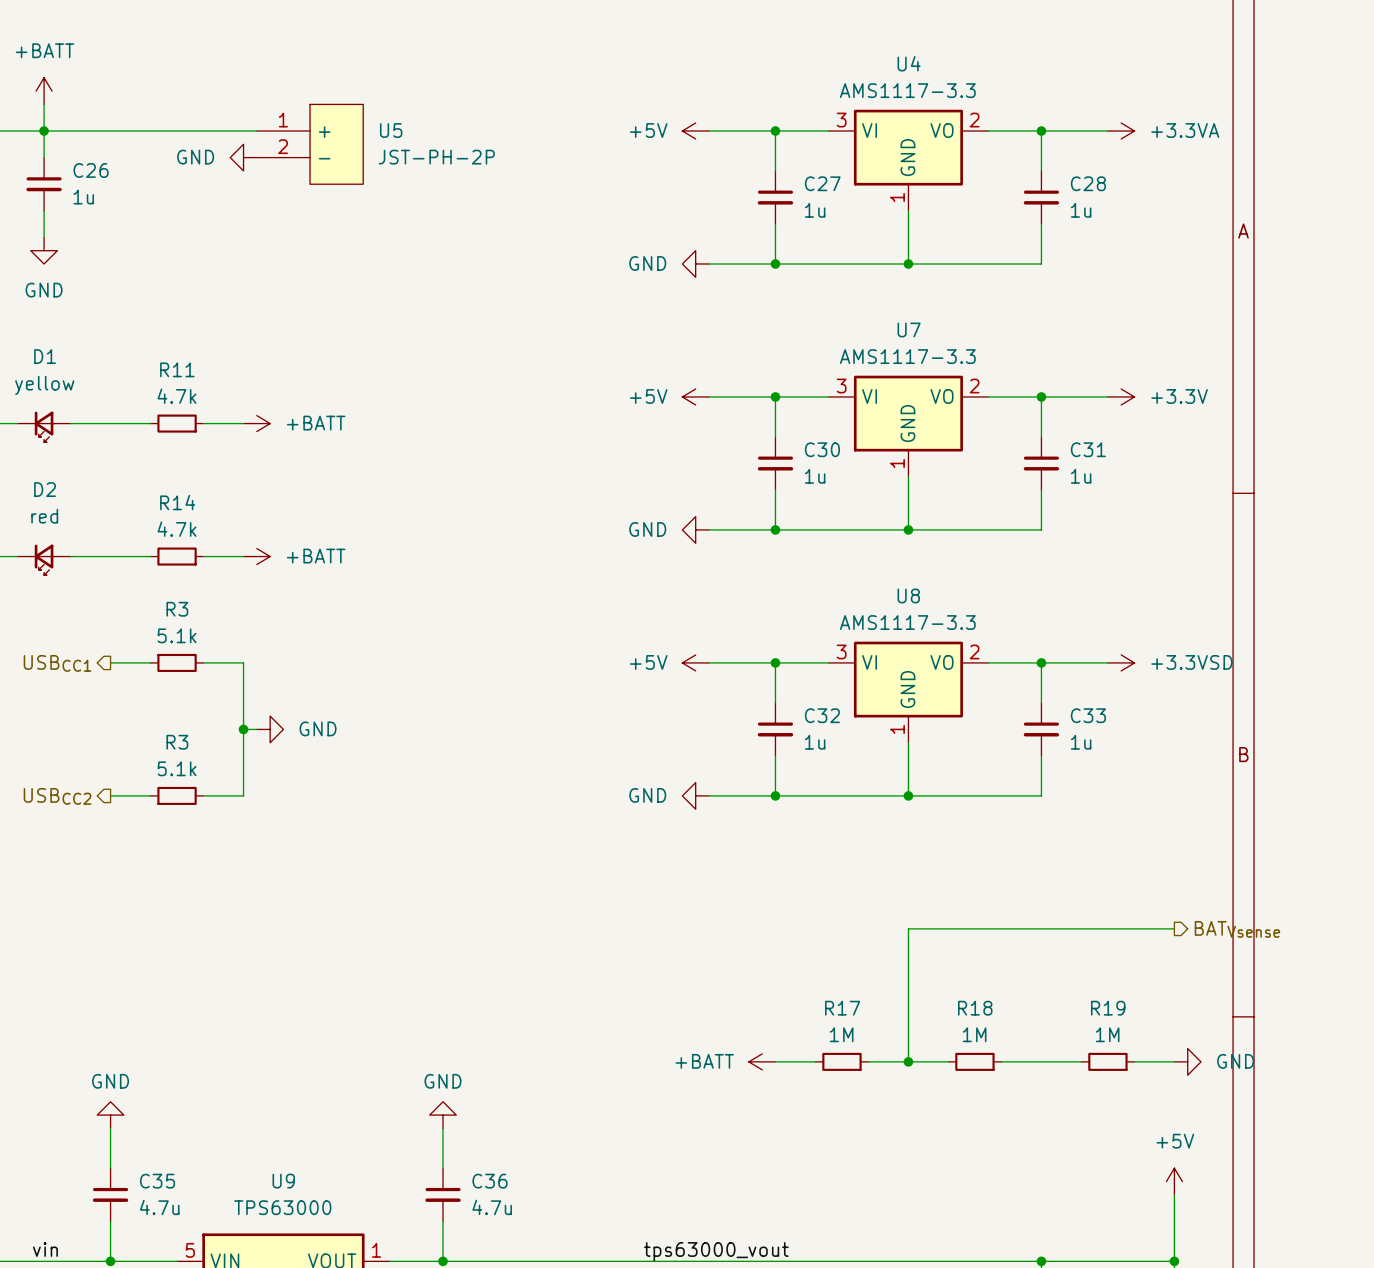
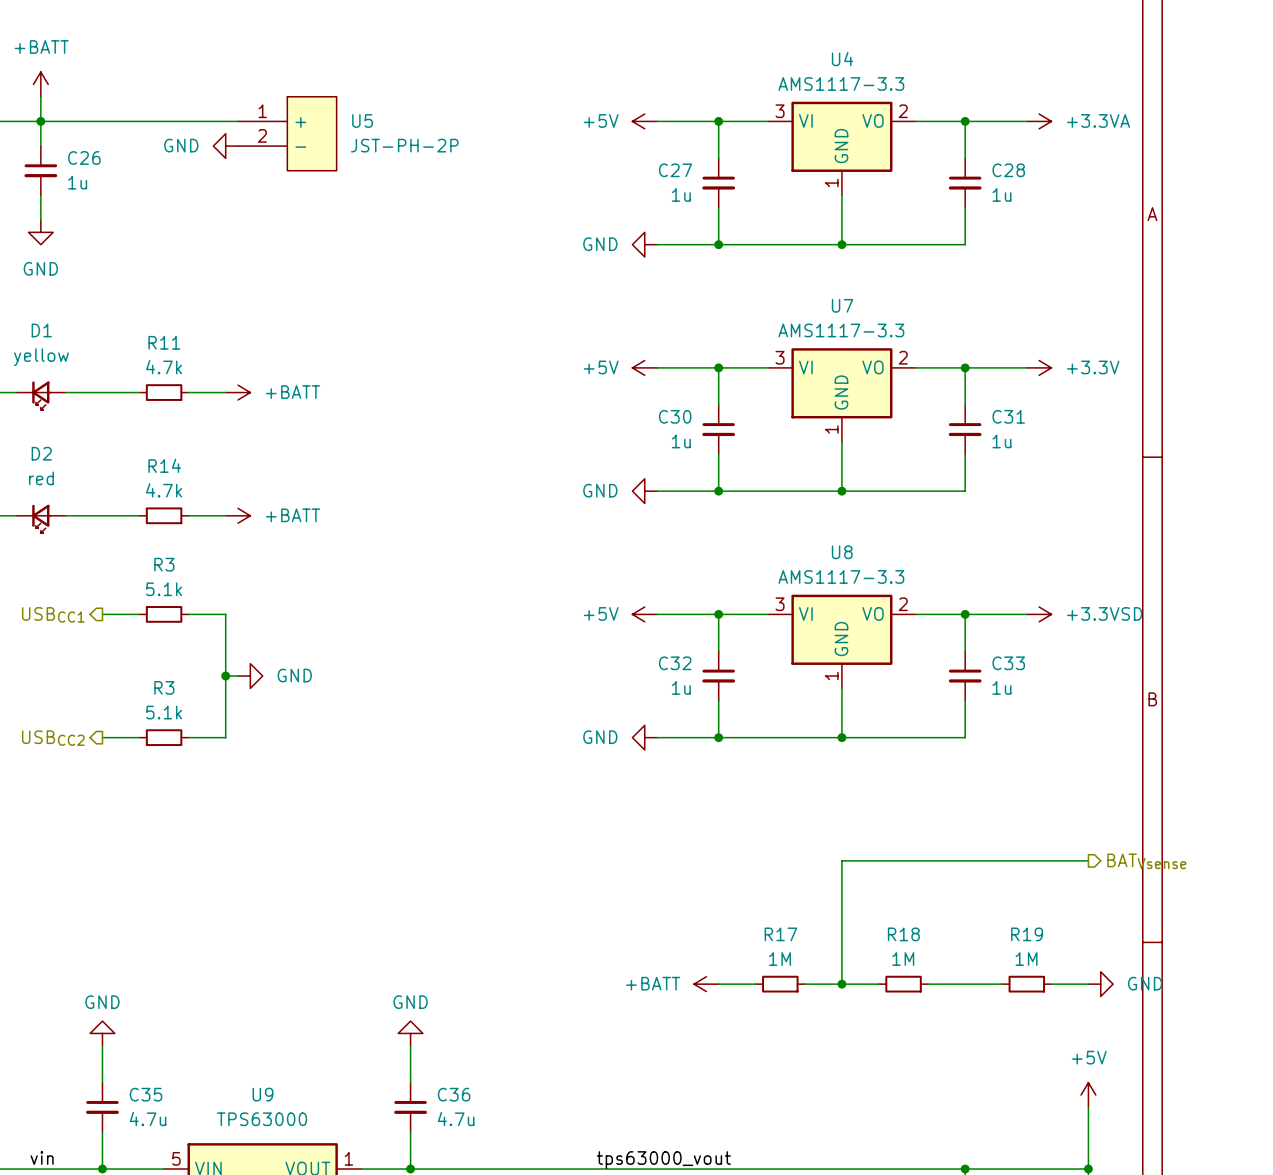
C27 name position: C27 (822, 183) -> C27 (675, 170)
C27 value position: 1u (815, 210) -> 1u (681, 194)
C30 name position: C30 (822, 449) -> C30 (675, 416)
C30 value position: 1u (815, 476) -> 1u (681, 441)
C32 name position: C32 (822, 715) -> C32 (675, 663)
C32 value position: 1u (815, 742) -> 1u (681, 687)

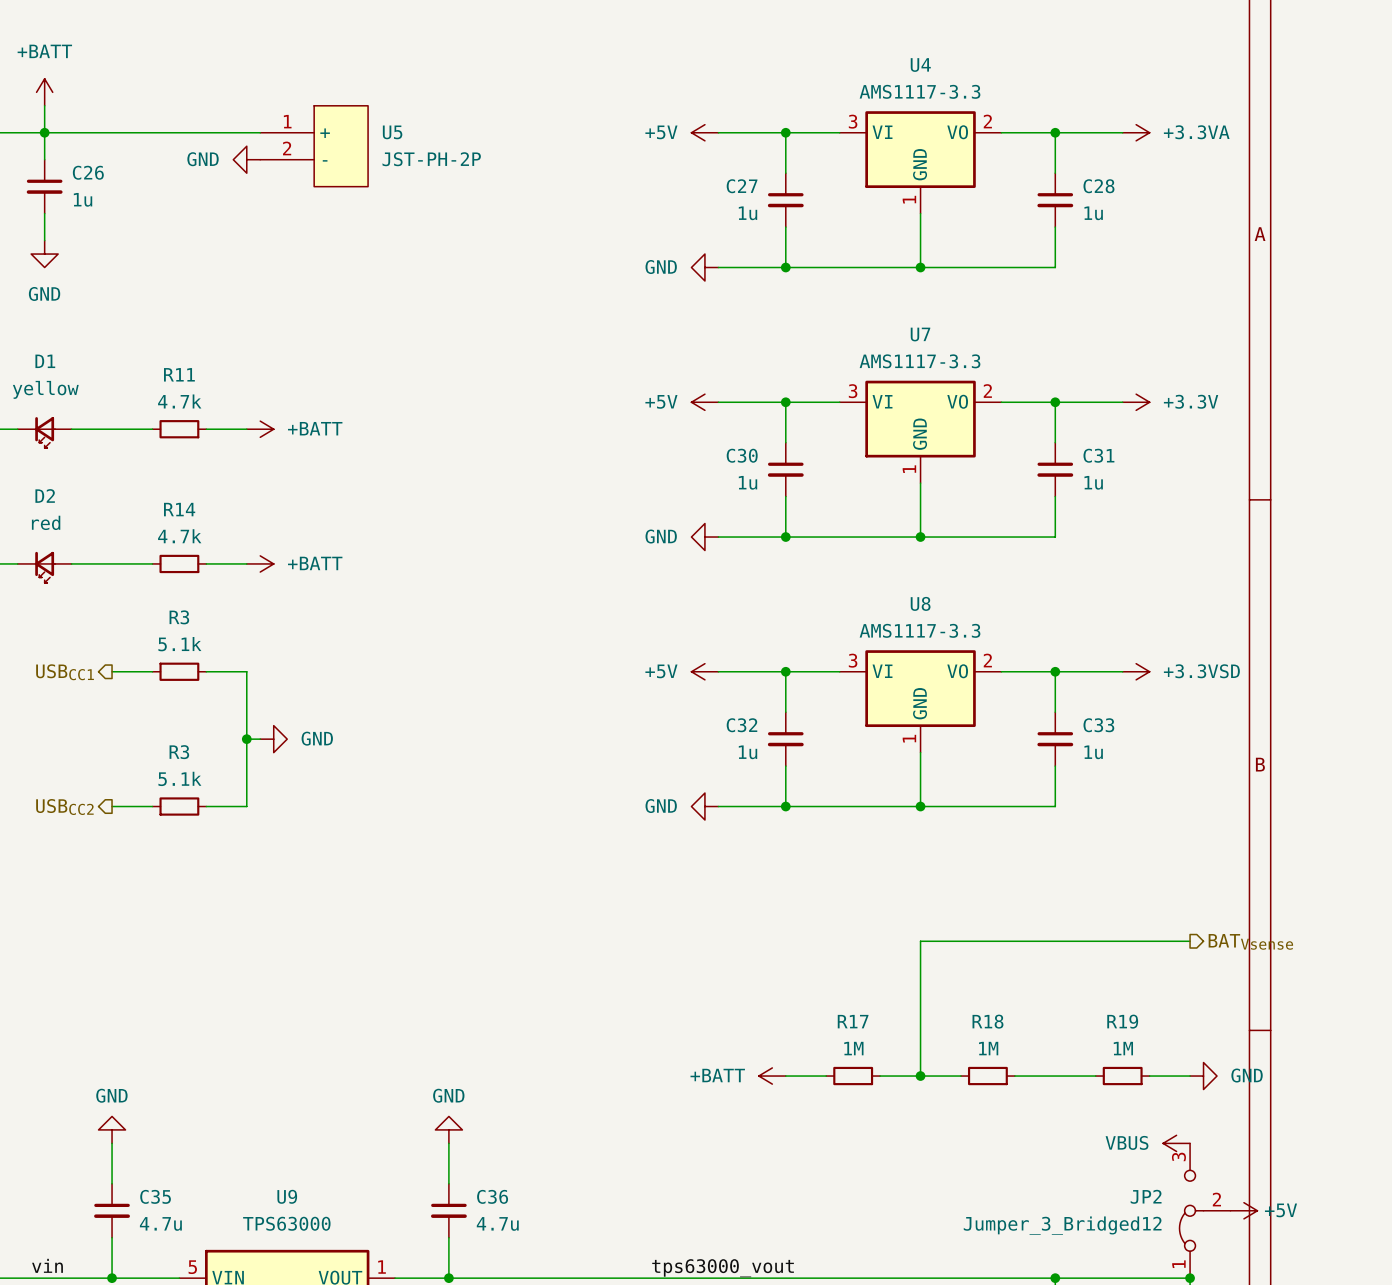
power symbol: none -> VBUS (1176, 1143)
power symbol rotation: 0° (1088, 1095) -> 90° clockwise (1243, 1210)
power symbol position: +5V (1088, 1095) -> +5V (1243, 1210)
wire: (1088, 1107) (1088, 1169) -> none
JP2: none -> Jumper_3_Bridged12 (1205, 1210)

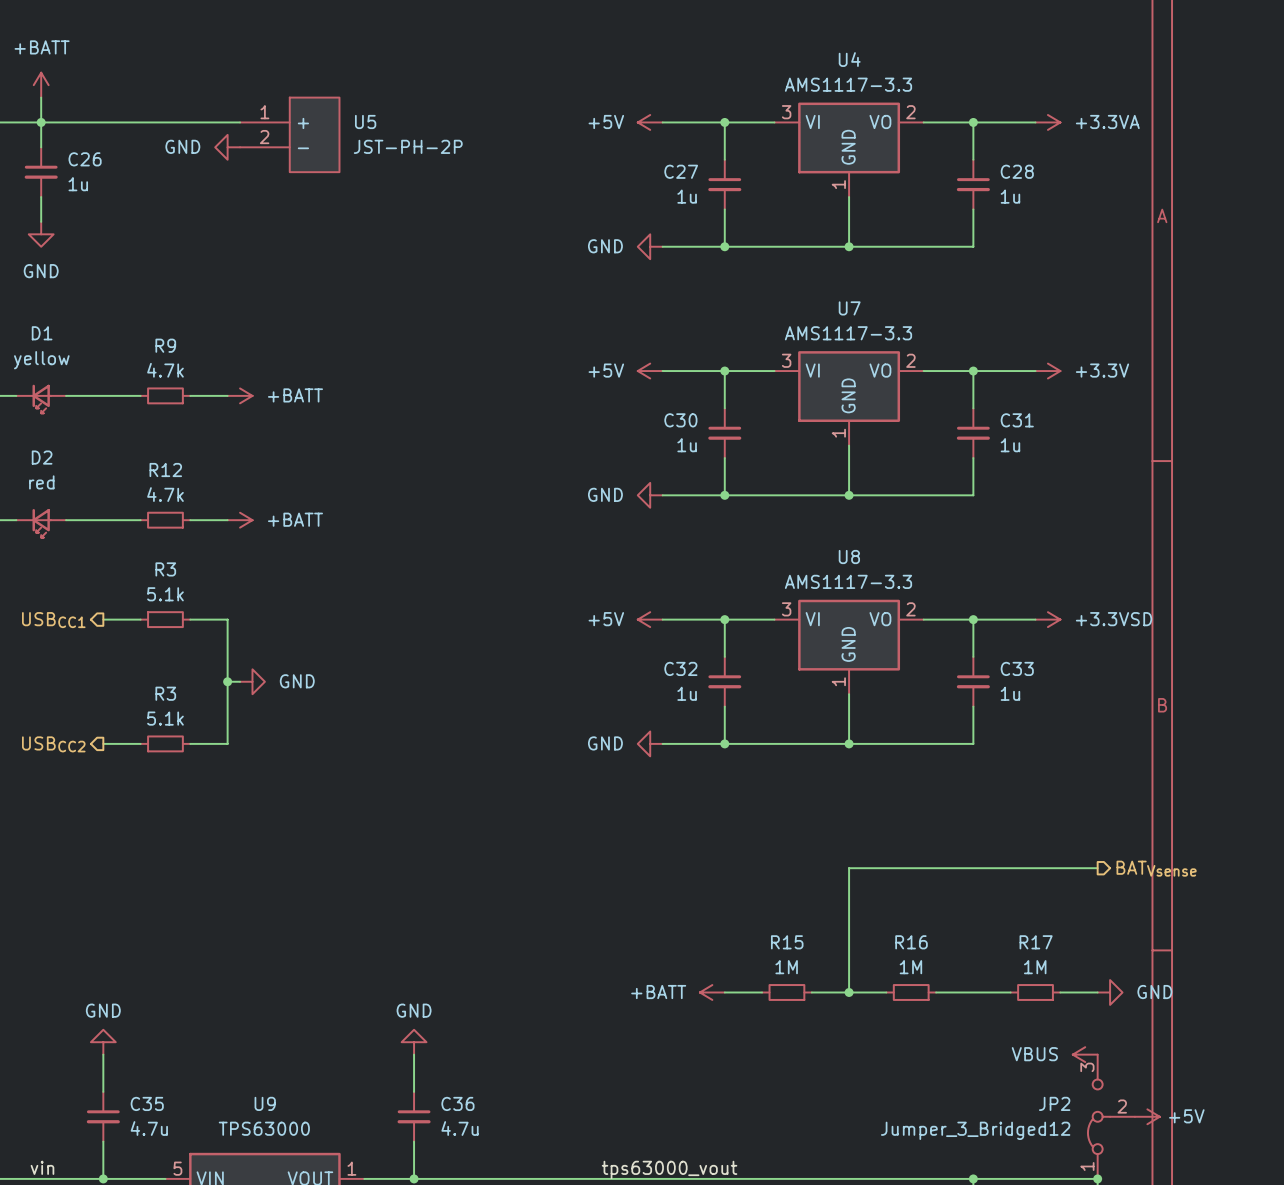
R11 name: R11 (179, 374) -> R9 (165, 345)
R14 name: R14 (179, 509) -> R12 (165, 470)
R17 name: R17 (853, 1021) -> R15 (787, 942)
R18 name: R18 (987, 1021) -> R16 (911, 942)
R19 name: R19 (1122, 1021) -> R17 (1036, 942)

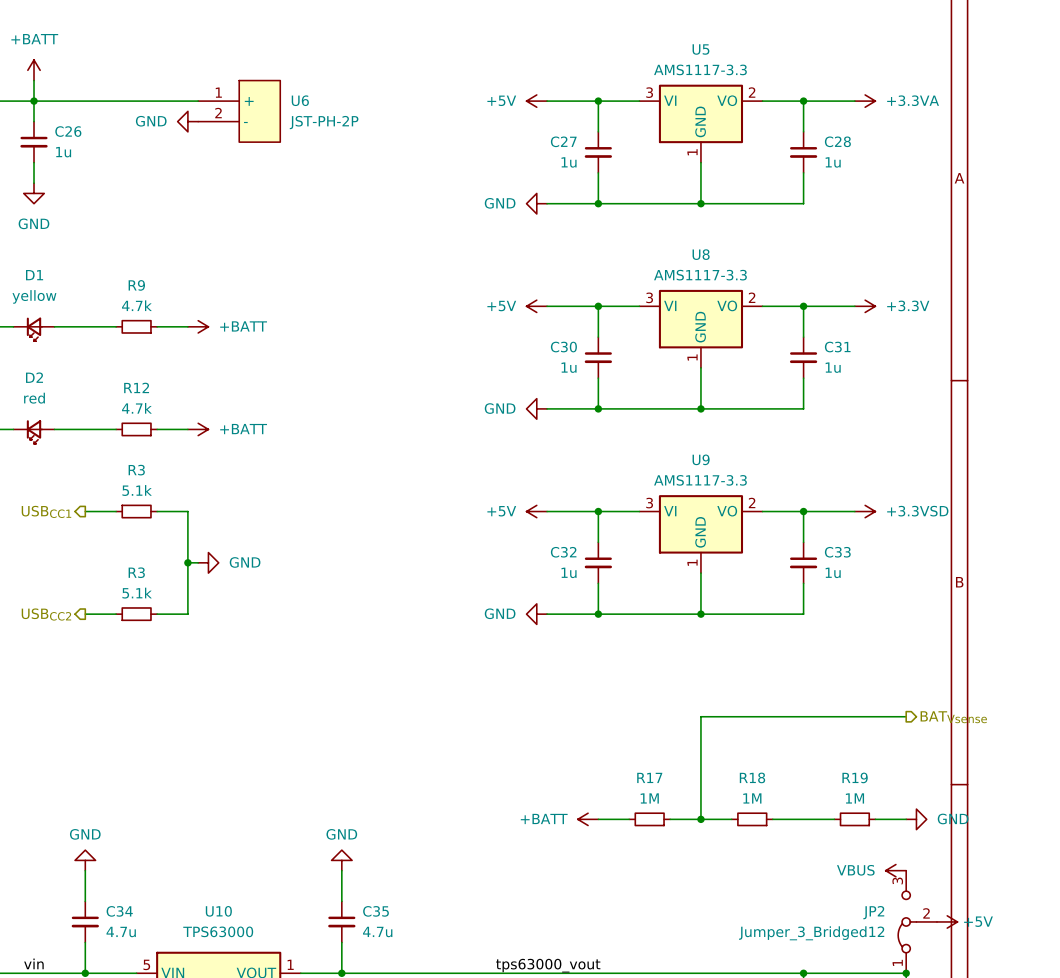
U4 name: U4 (849, 59) -> U5 (700, 49)
U5 name: U5 (365, 121) -> U6 (300, 100)
U7 name: U7 (849, 308) -> U8 (701, 254)
U8 name: U8 (849, 557) -> U9 (701, 459)
R15 name: R15 (787, 942) -> R17 (649, 777)
R16 name: R16 (911, 942) -> R18 (752, 777)
R17 name: R17 (1036, 942) -> R19 (855, 777)
C35 name: C35 (147, 1103) -> C34 (119, 911)
U9 name: U9 (265, 1103) -> U10 (218, 911)
C36 name: C36 (457, 1103) -> C35 (376, 911)

